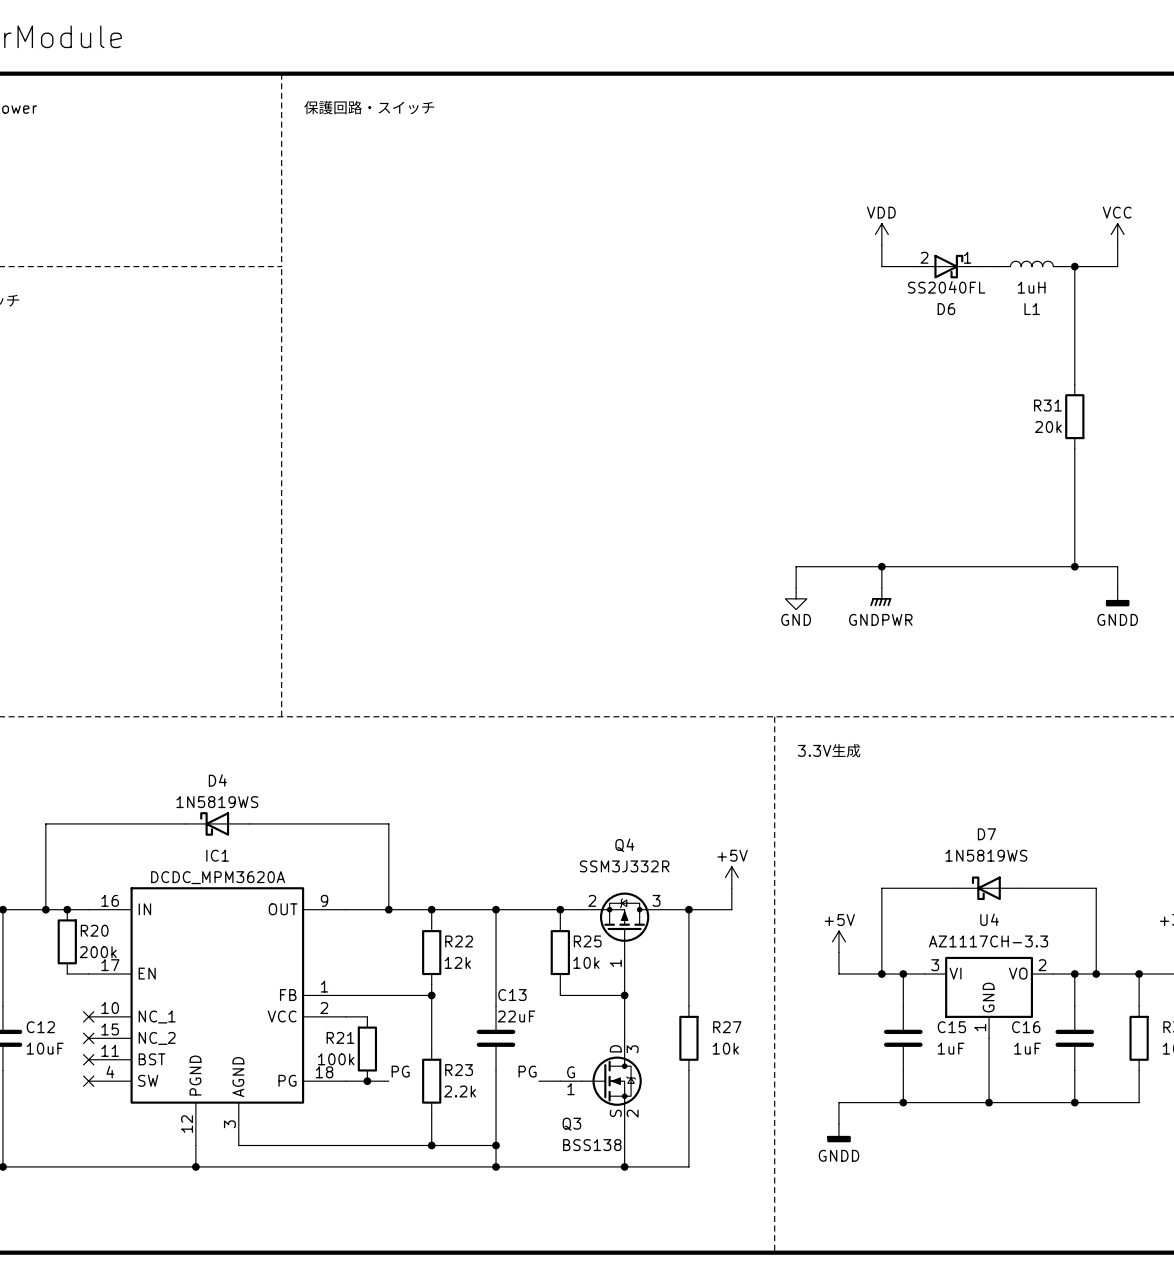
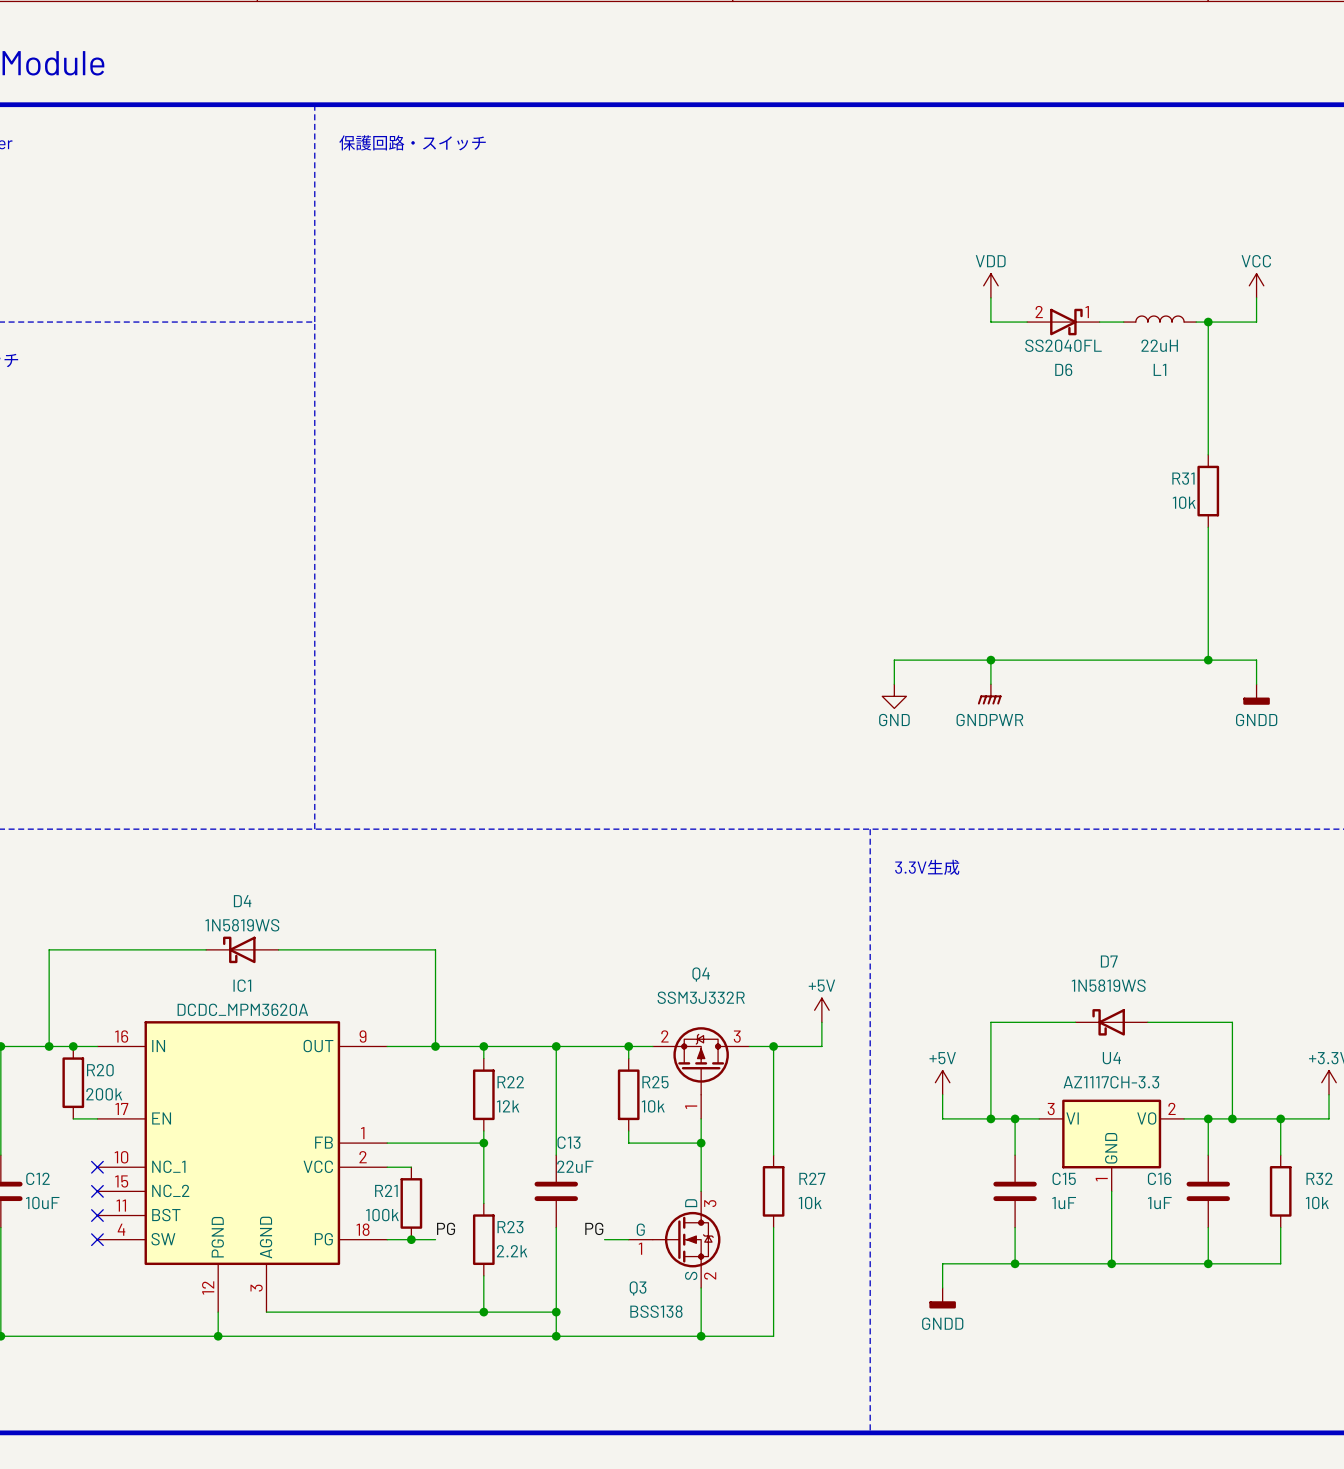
L1 value: 1uH (1031, 287) -> 22uH (1159, 345)
R31 value: 20k (1048, 426) -> 10k (1184, 502)

